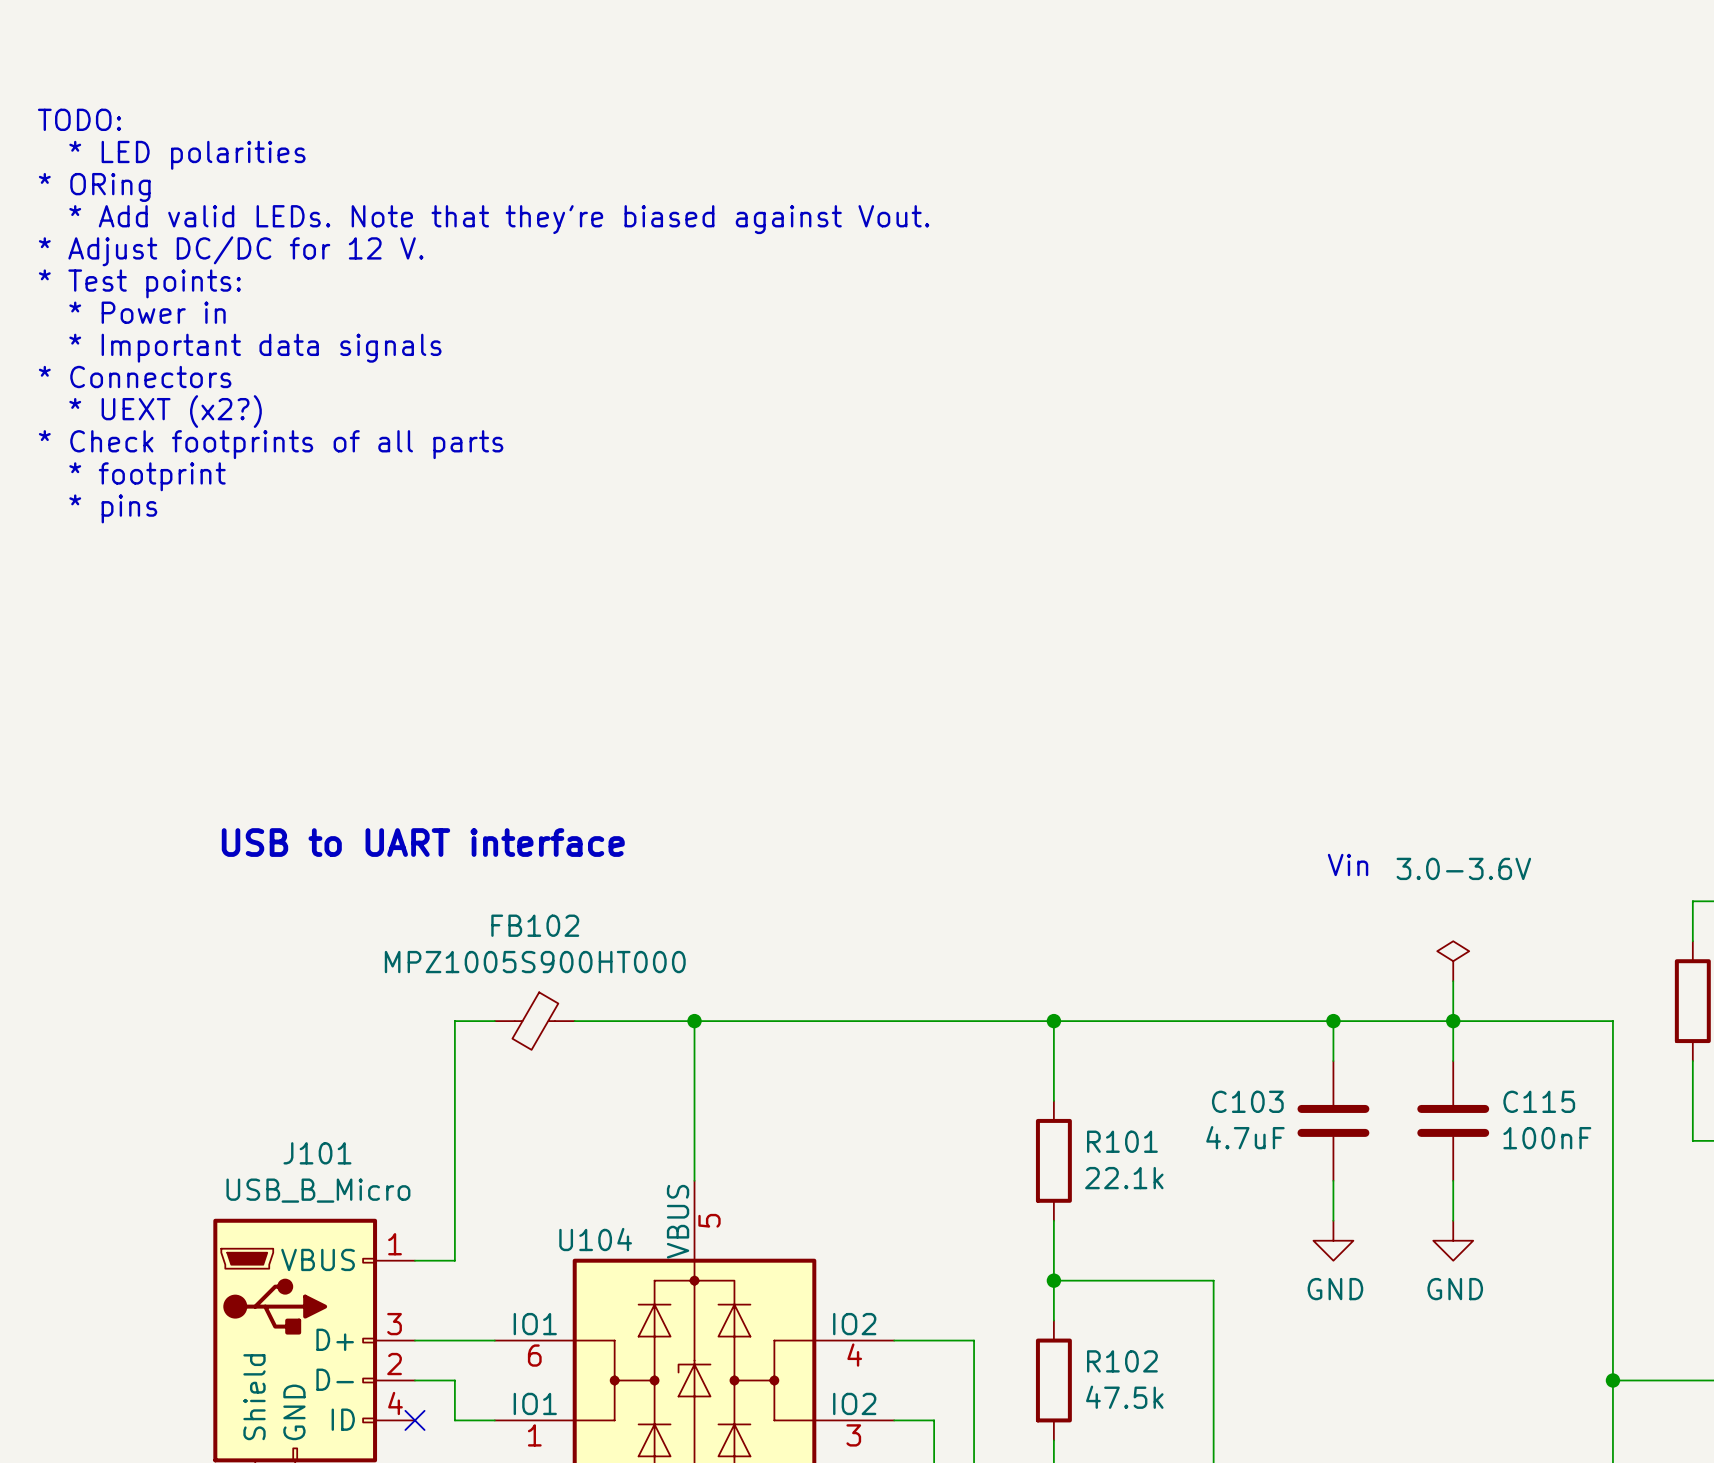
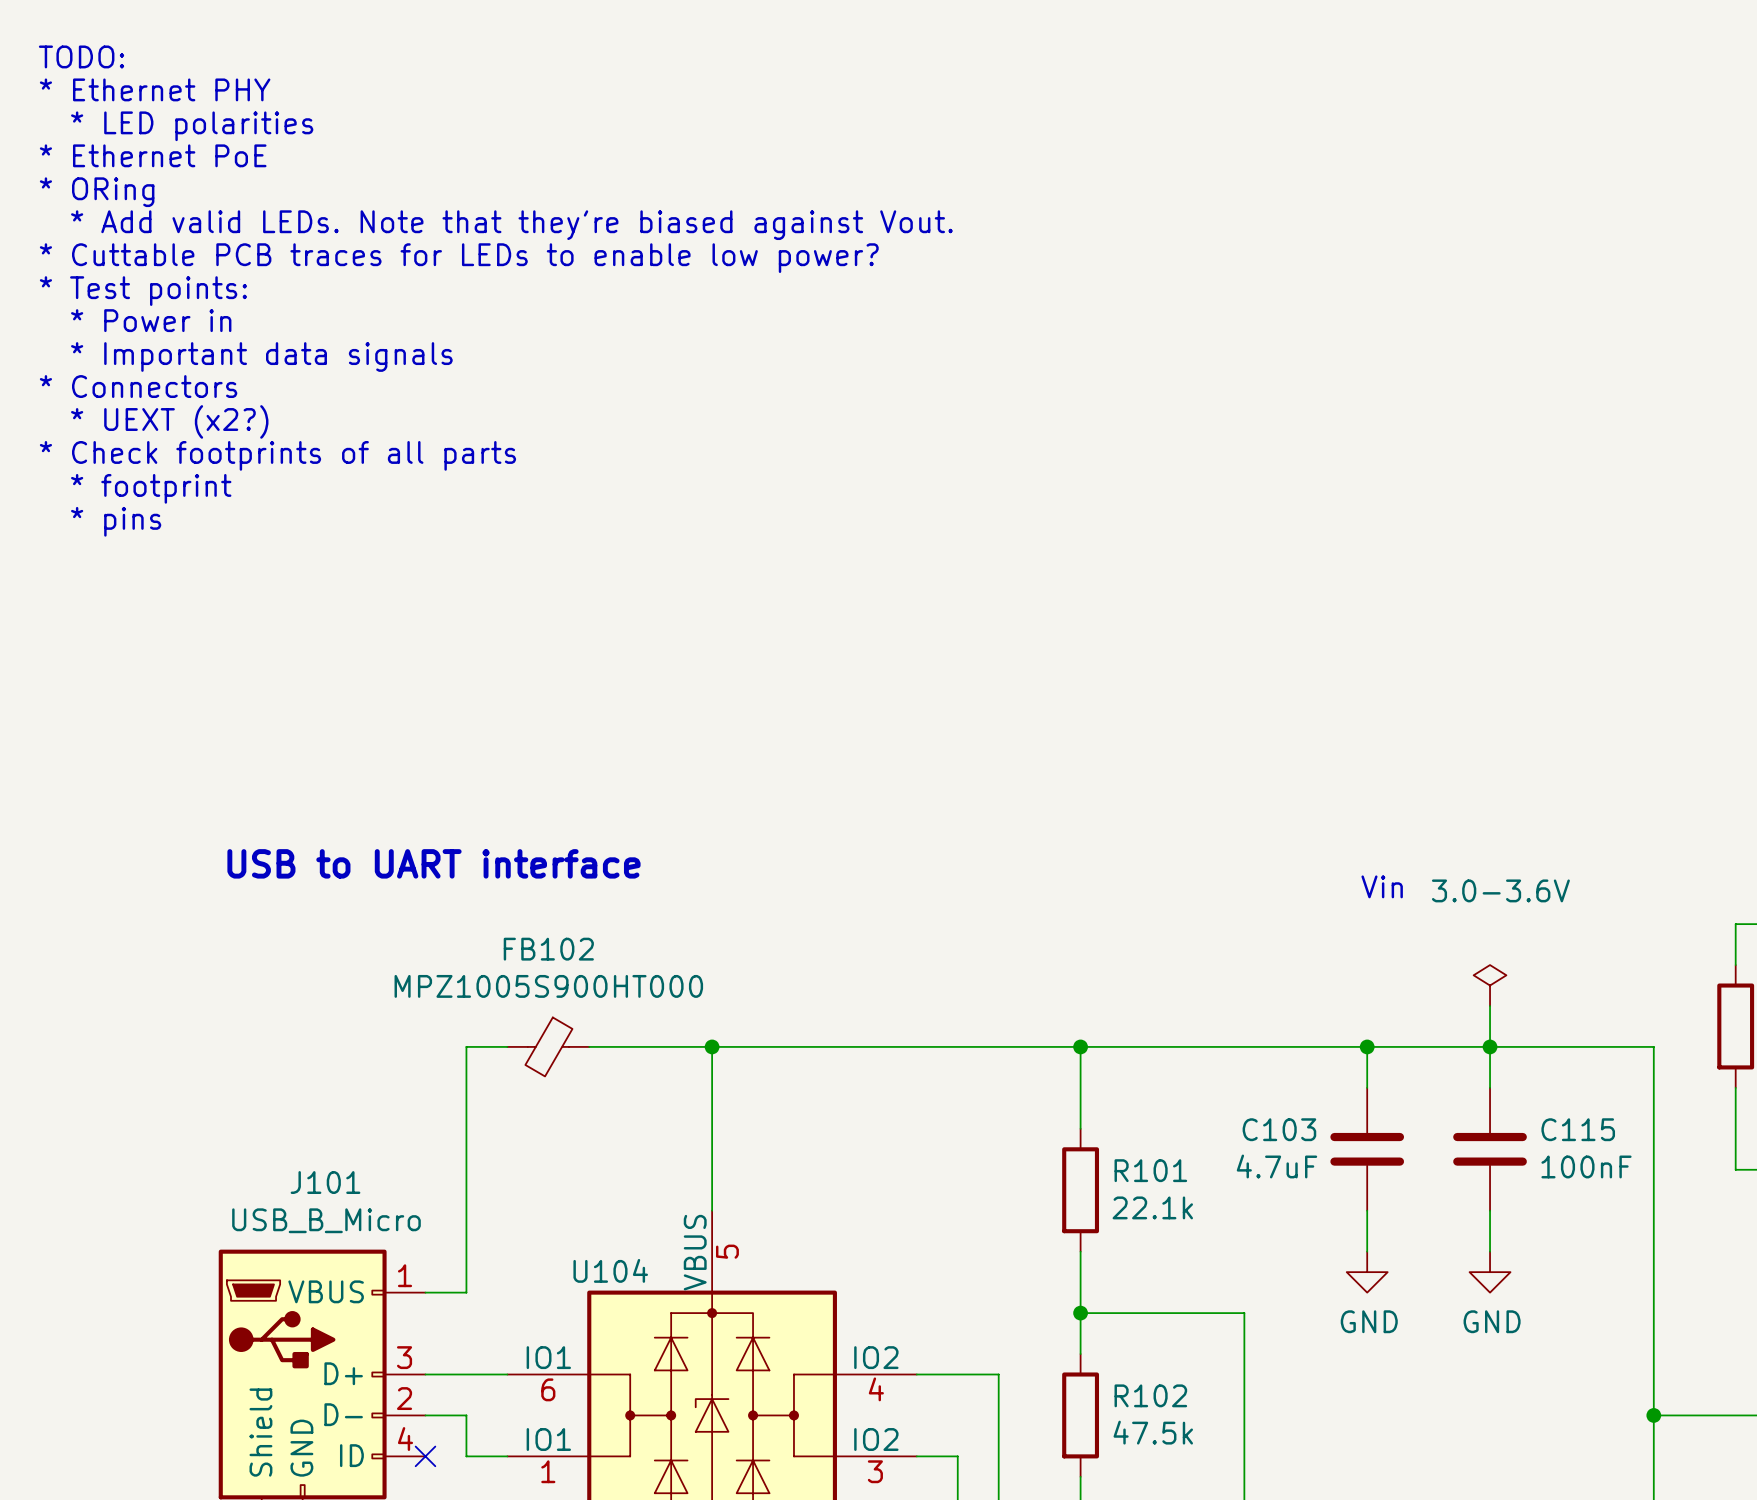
text: none -> TODO: (81, 56)
text: none -> * Ethernet PHY (155, 89)
text: TODO: (79, 119) -> * LED polarities (192, 126)
text: * LED polarities (187, 155) -> * Ethernet PoE (153, 155)
text: * Adjust DC/DC for 12 V. (231, 251) -> * Cuttable PCB traces for LEDs to enable low power? (459, 258)

